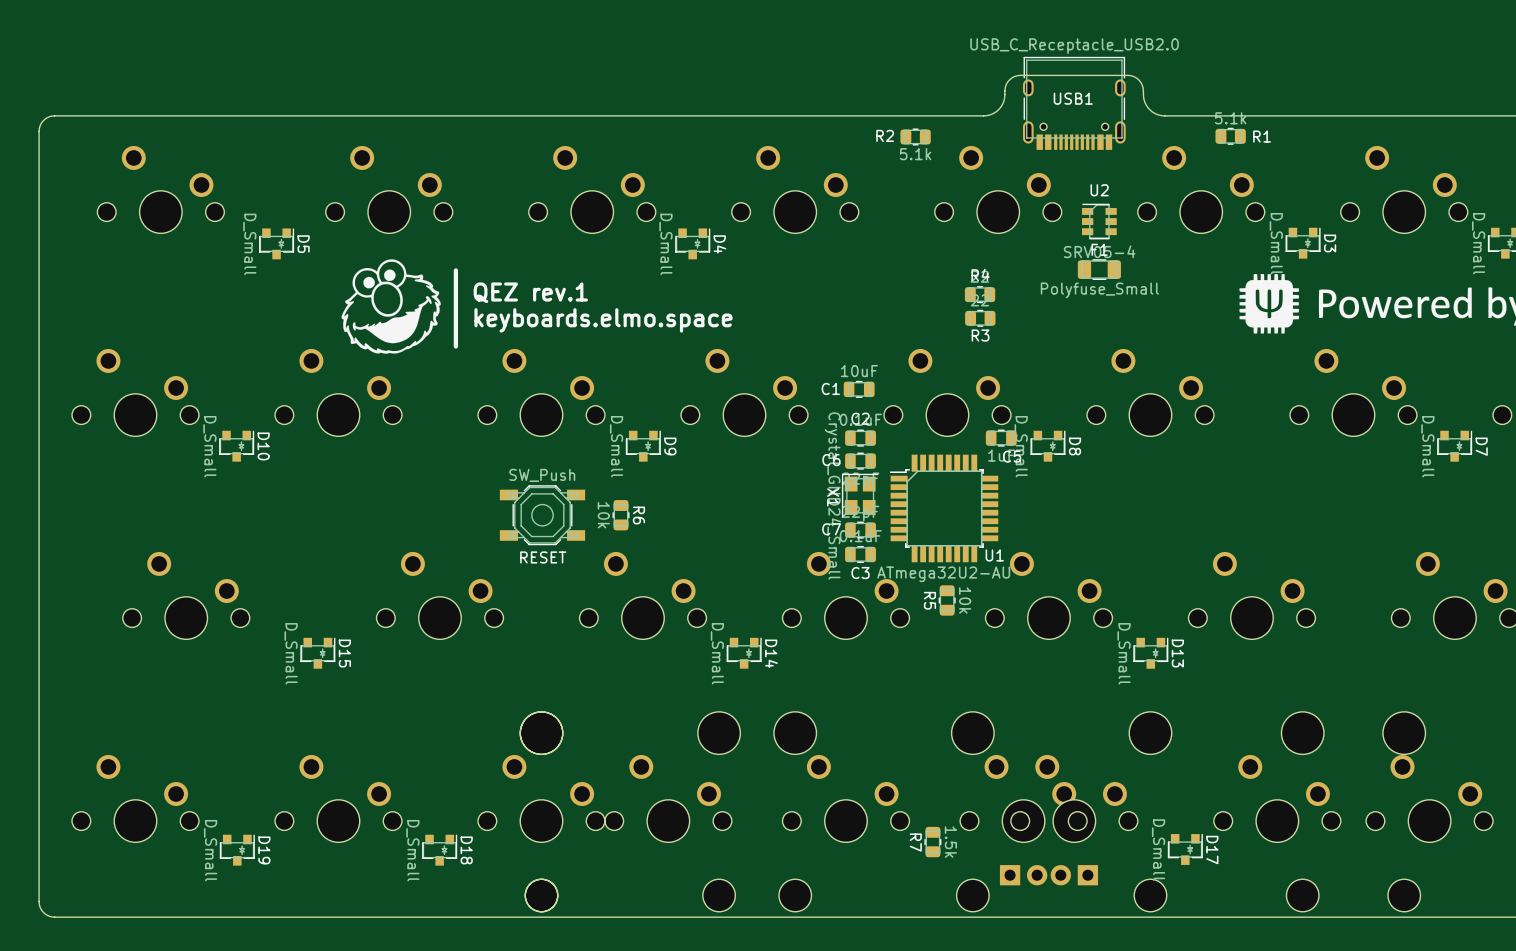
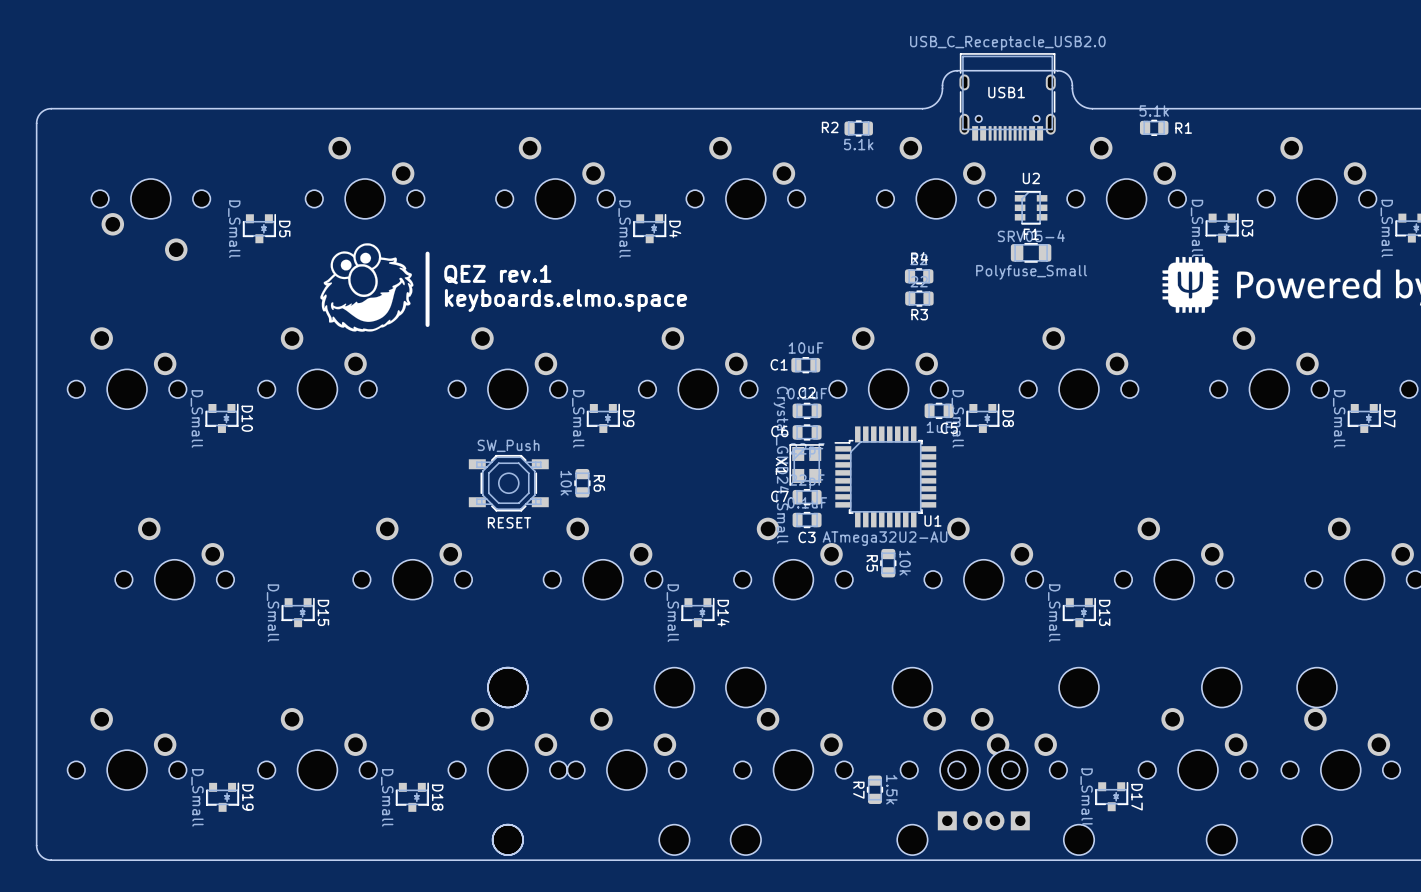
part rotation: 0° (160, 189) -> 180° (150, 219)

